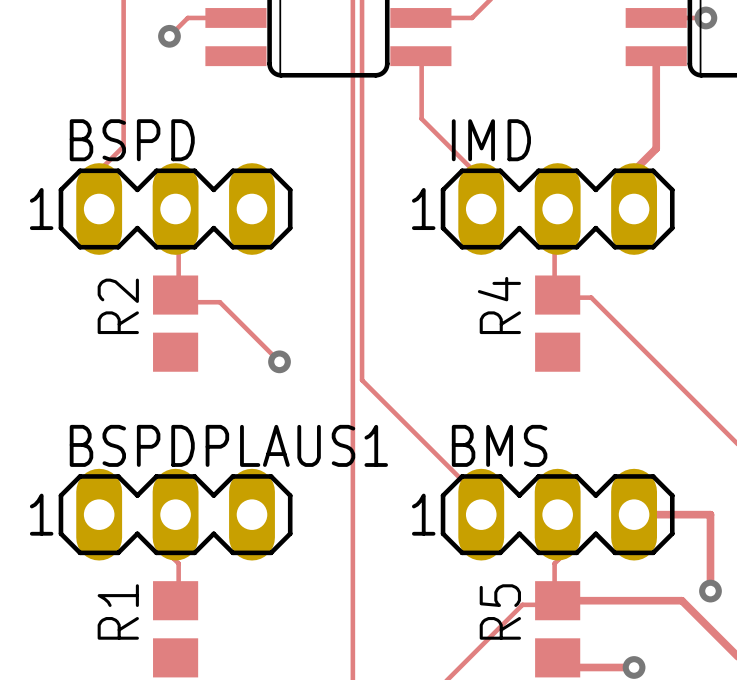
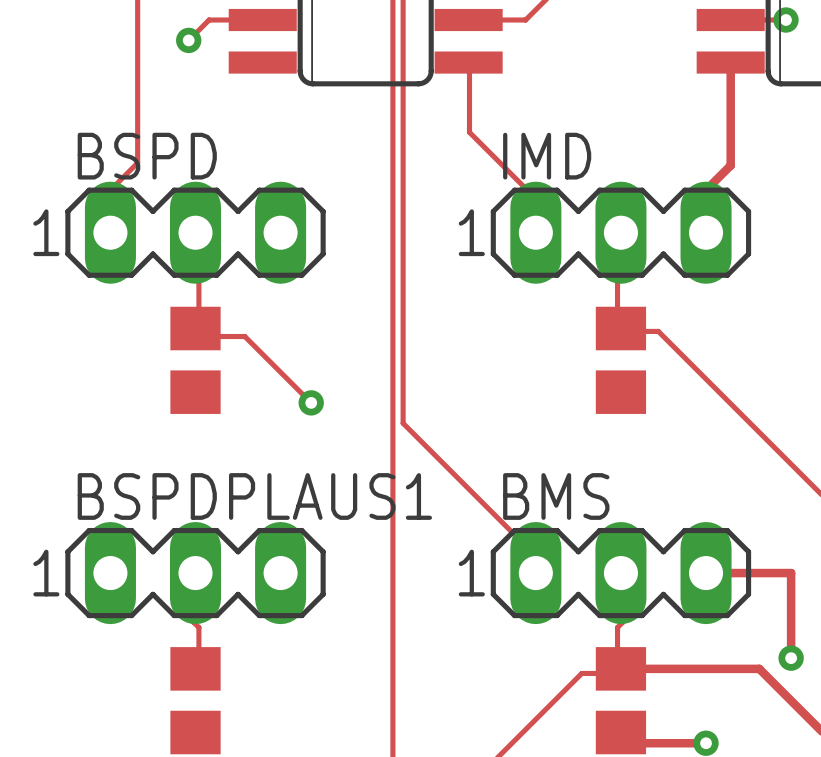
R4 name: R4 (499, 305) -> none
R2 name: R2 (118, 306) -> none
R1 name: R1 (118, 611) -> none
R5 name: R5 (500, 611) -> none

